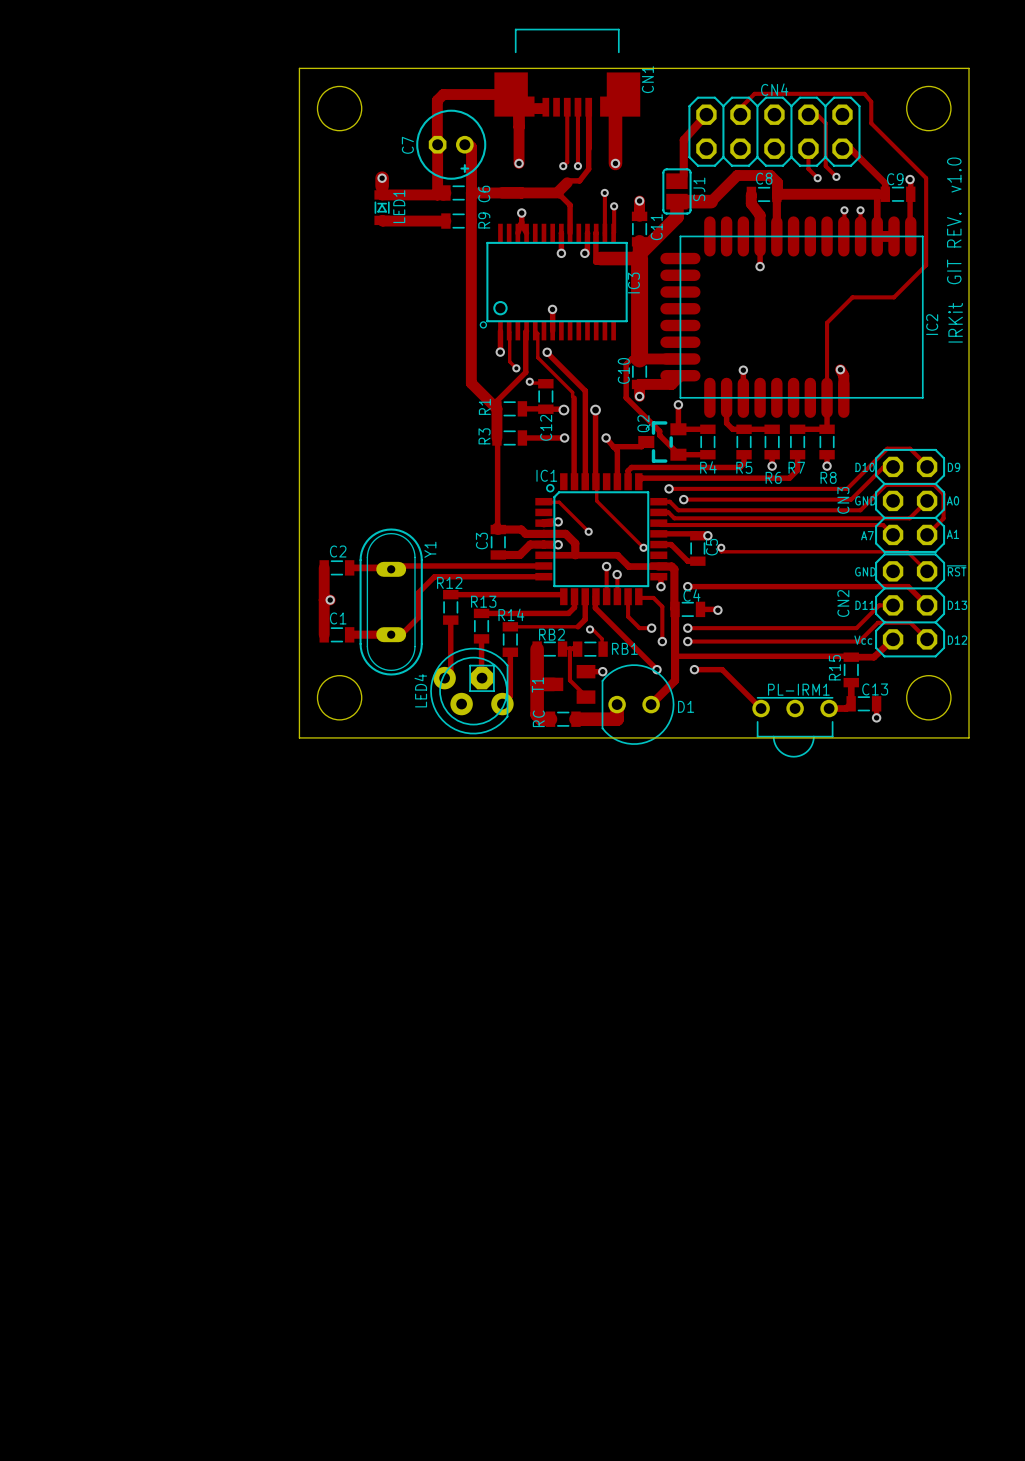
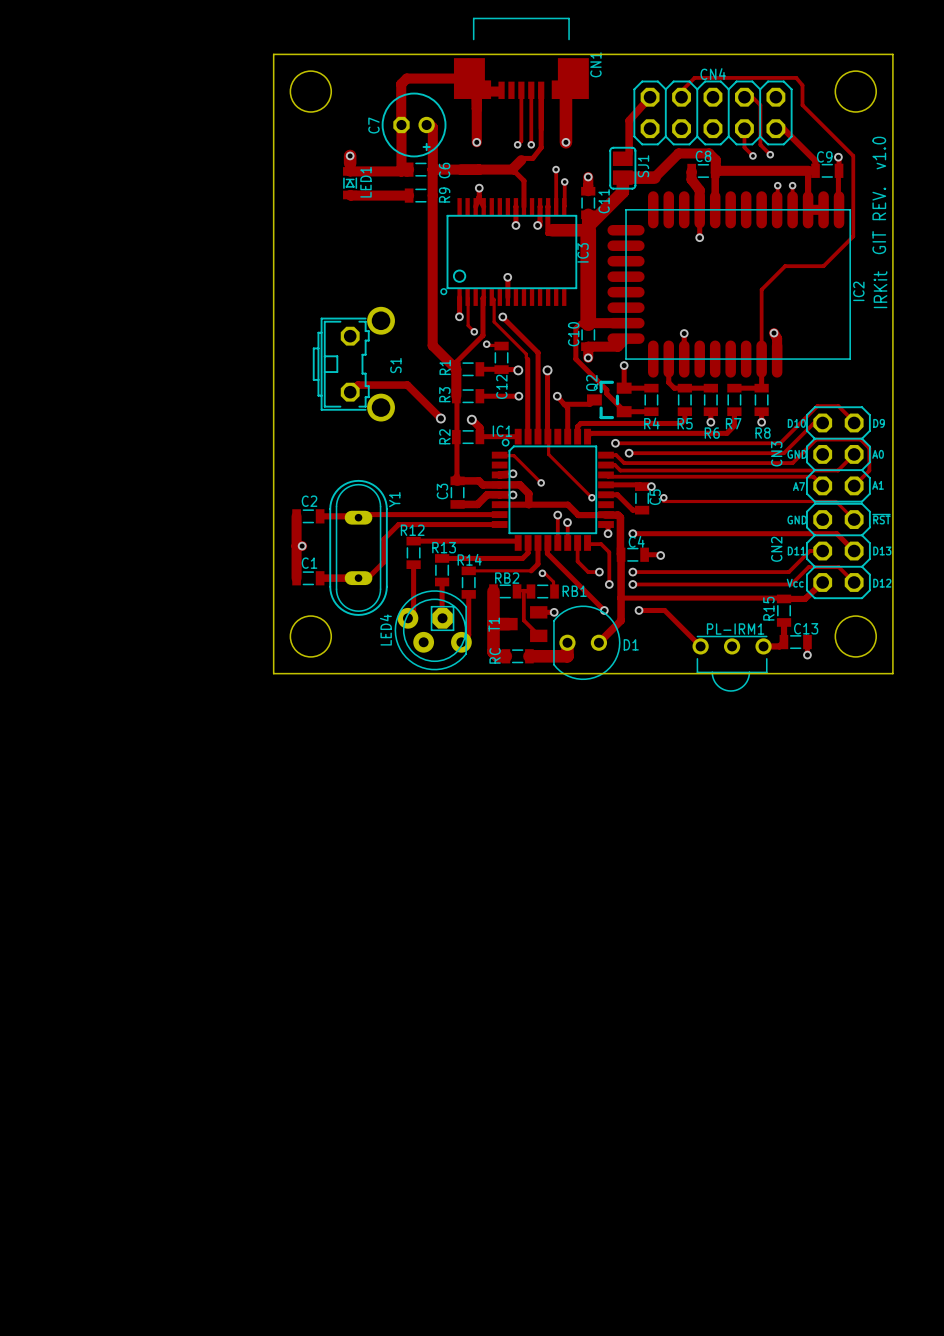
S1: none -> (353, 364)
track: none -> (350, 392) (357, 385) (407, 385) (440, 418)
via: none -> (440, 418)
track: none -> (471, 419) (479, 427) (479, 437) (518, 436)
via: none -> (471, 419)
R2: none -> (468, 437)

